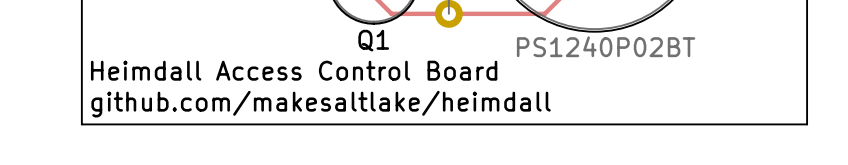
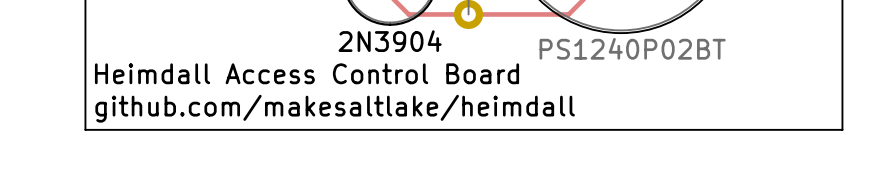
Q1 name: Q1 (373, 40) -> 2N3904 (390, 41)

